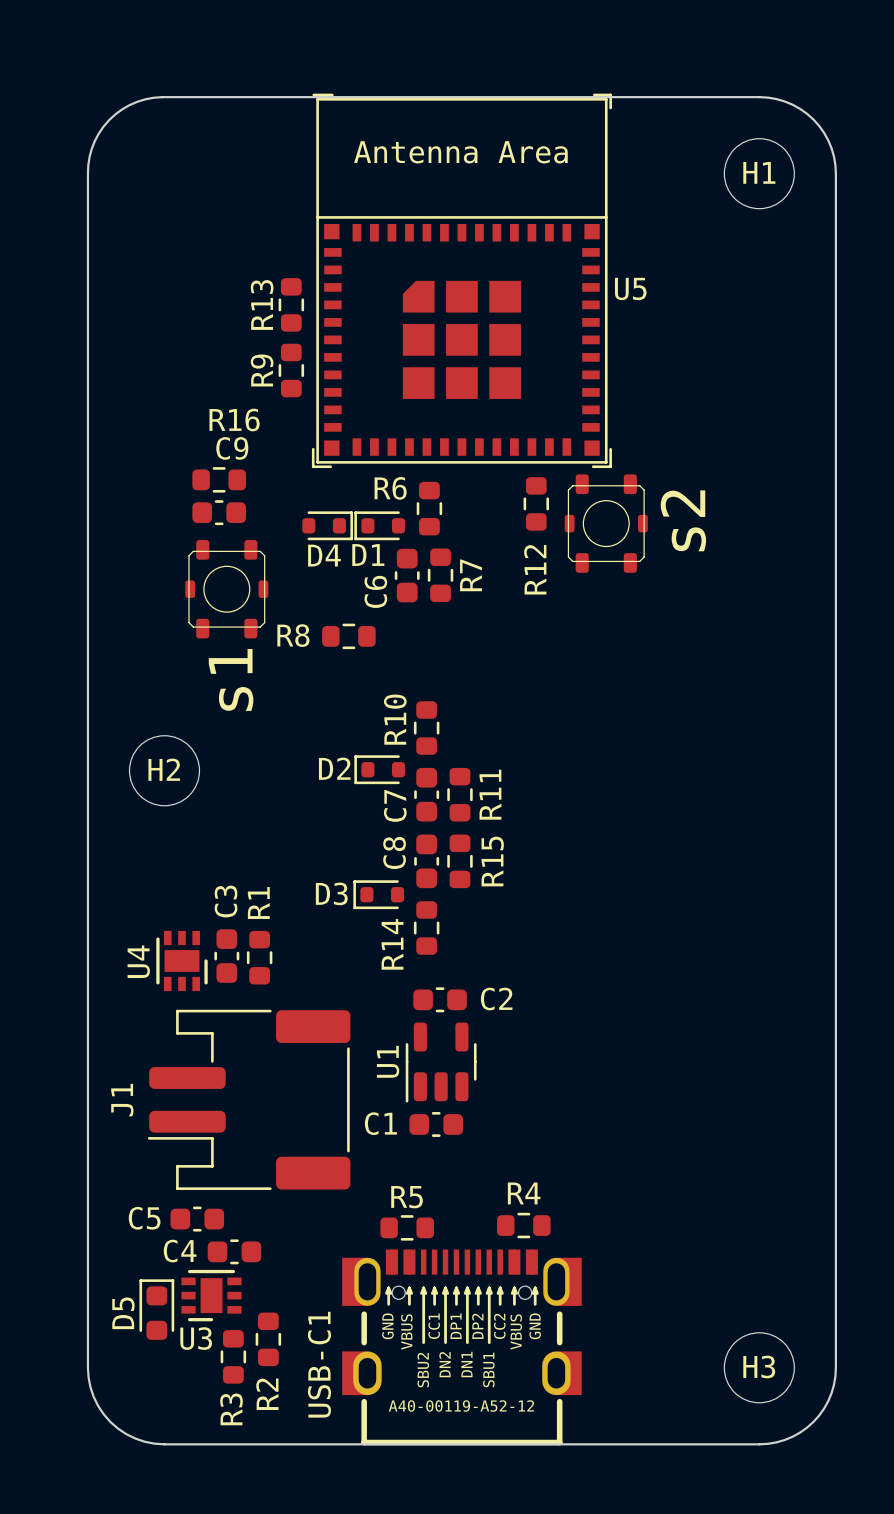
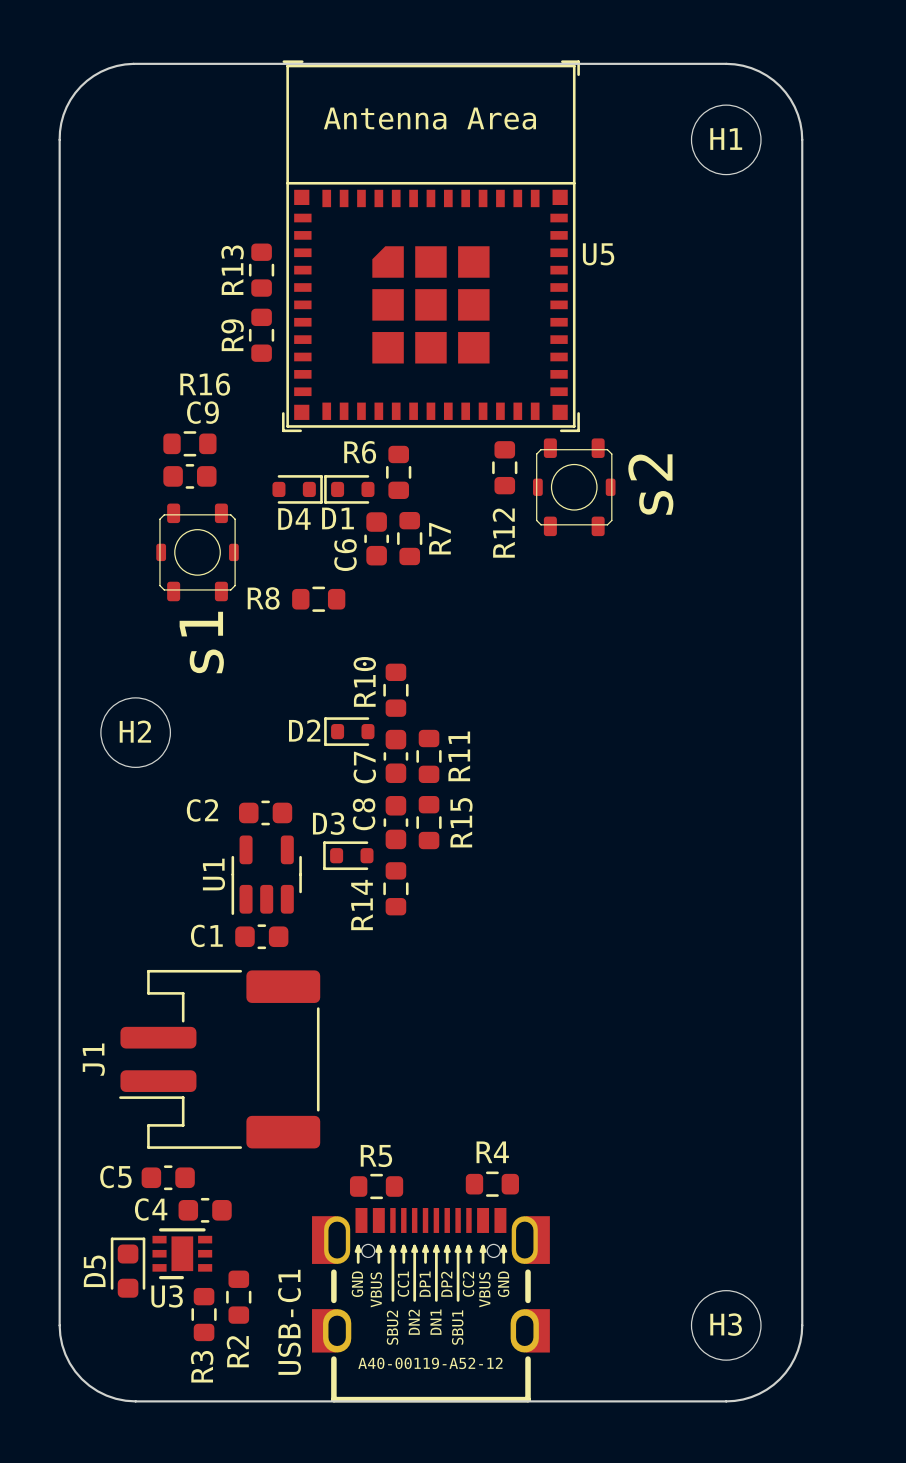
D3 name position: D3 (331, 893) -> D3 (328, 823)
C3: (226, 956) -> none
R1: (259, 957) -> none
U4: (181, 961) -> none
C2 position: (440, 999) -> (265, 812)
C2 name position: C2 (496, 999) -> C2 (202, 810)
U1 position: (441, 1062) -> (266, 875)
C1 position: (436, 1124) -> (261, 936)

